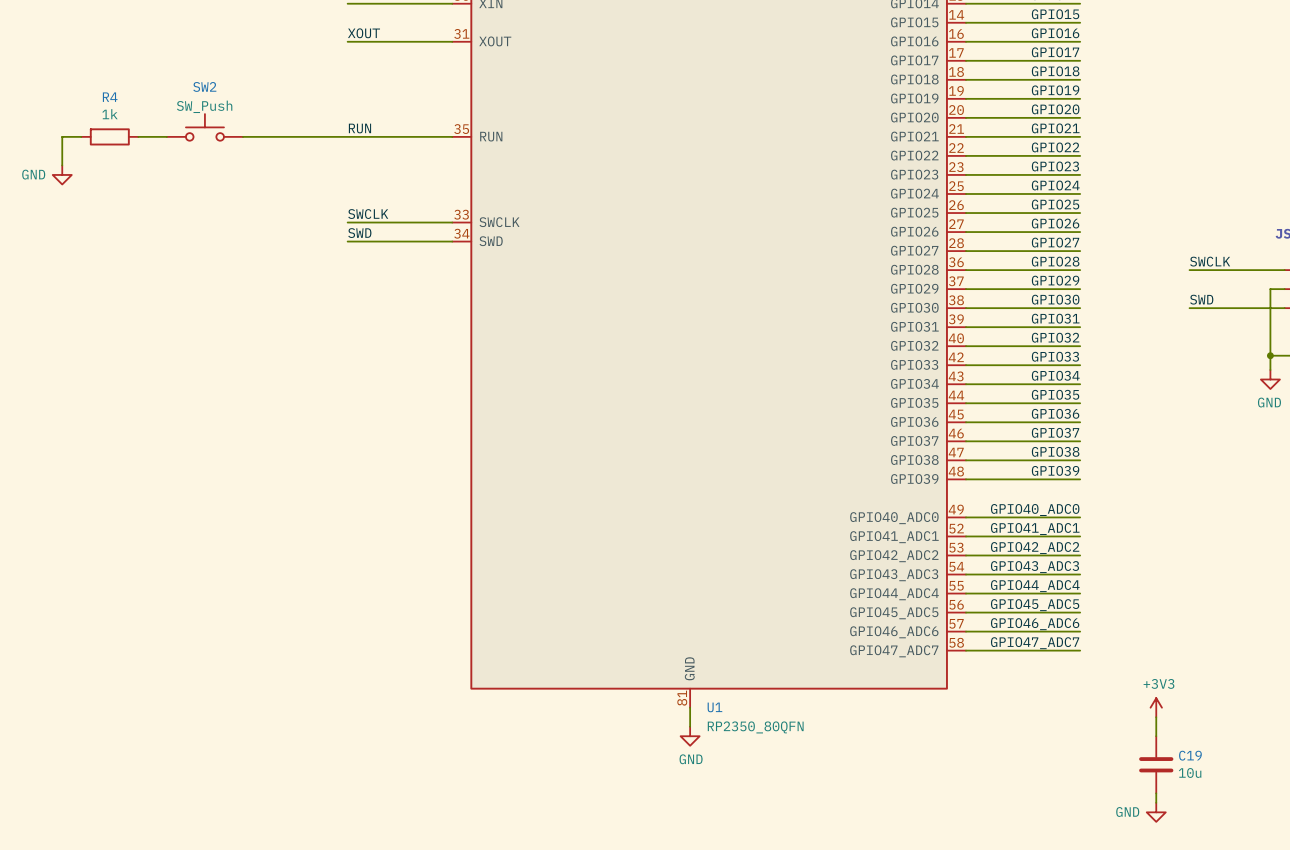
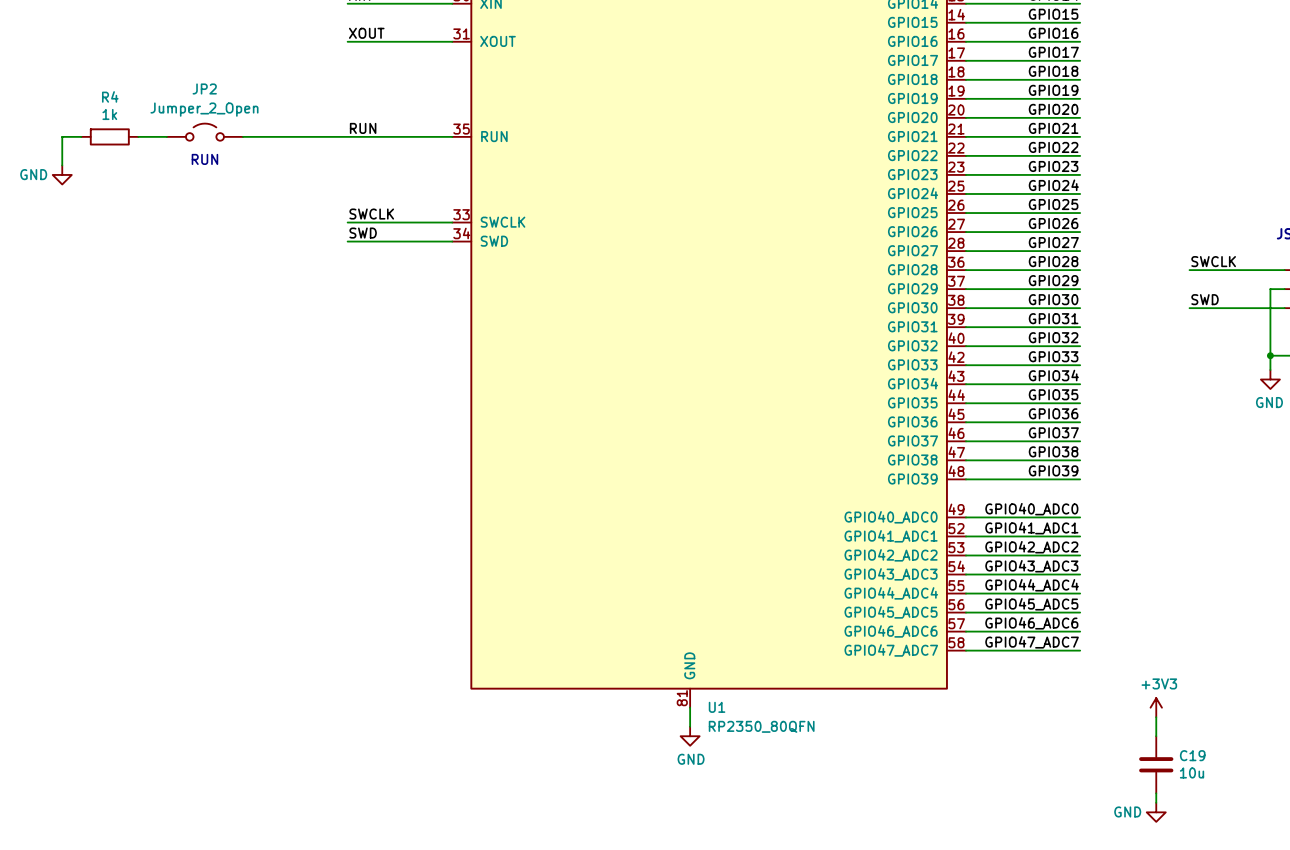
SW2: SW_Push (204, 127) -> none
JP2: none -> Jumper_2_Open (204, 132)
text: none -> RUN (204, 159)

